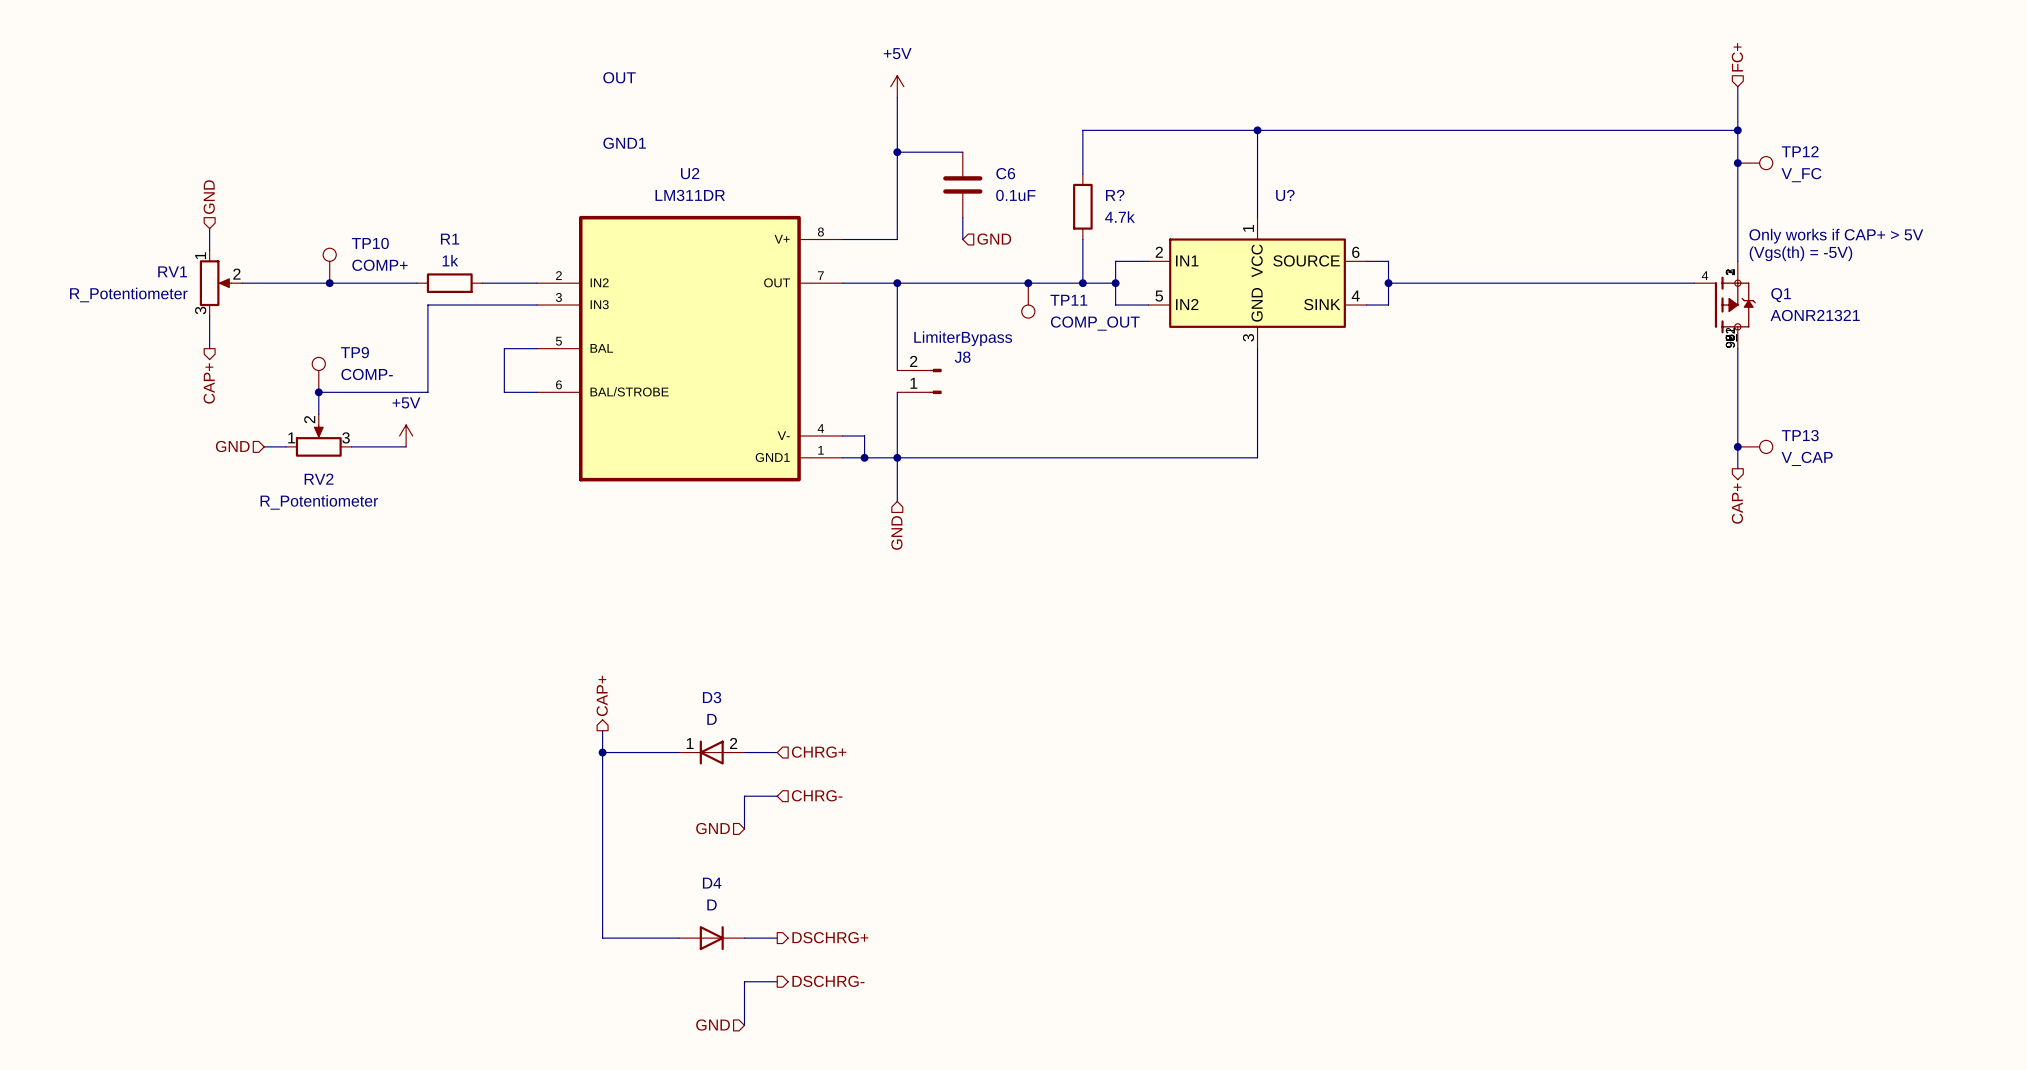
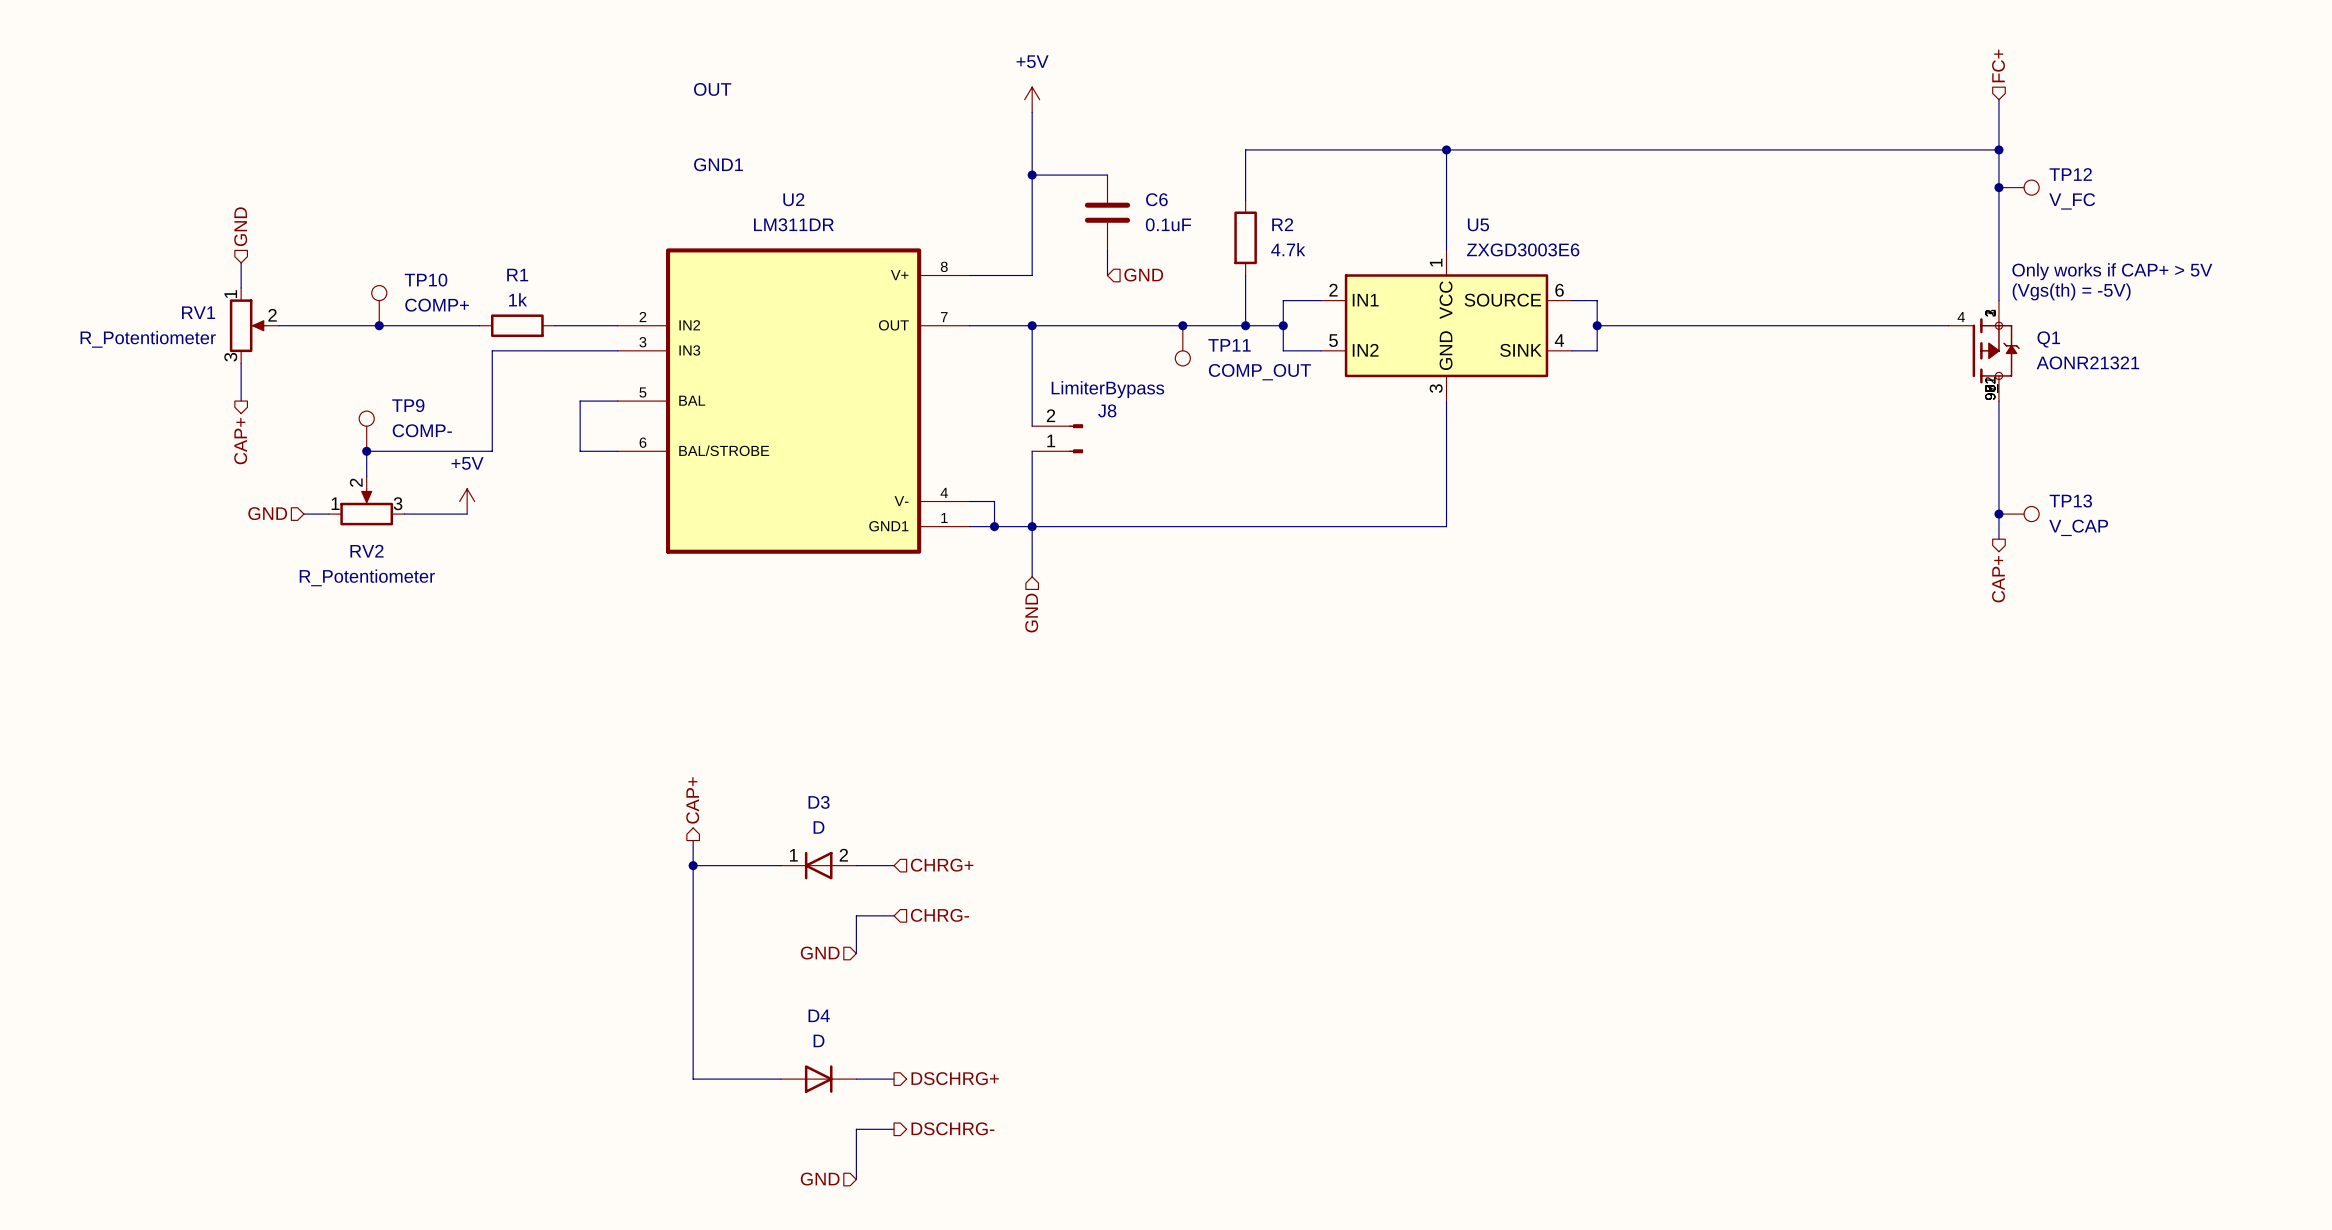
R? name: R? (1115, 195) -> R2 (1282, 224)
U? name: U? (1285, 195) -> U5 (1478, 224)
U? value: none -> ZXGD3003E6 (1523, 249)

